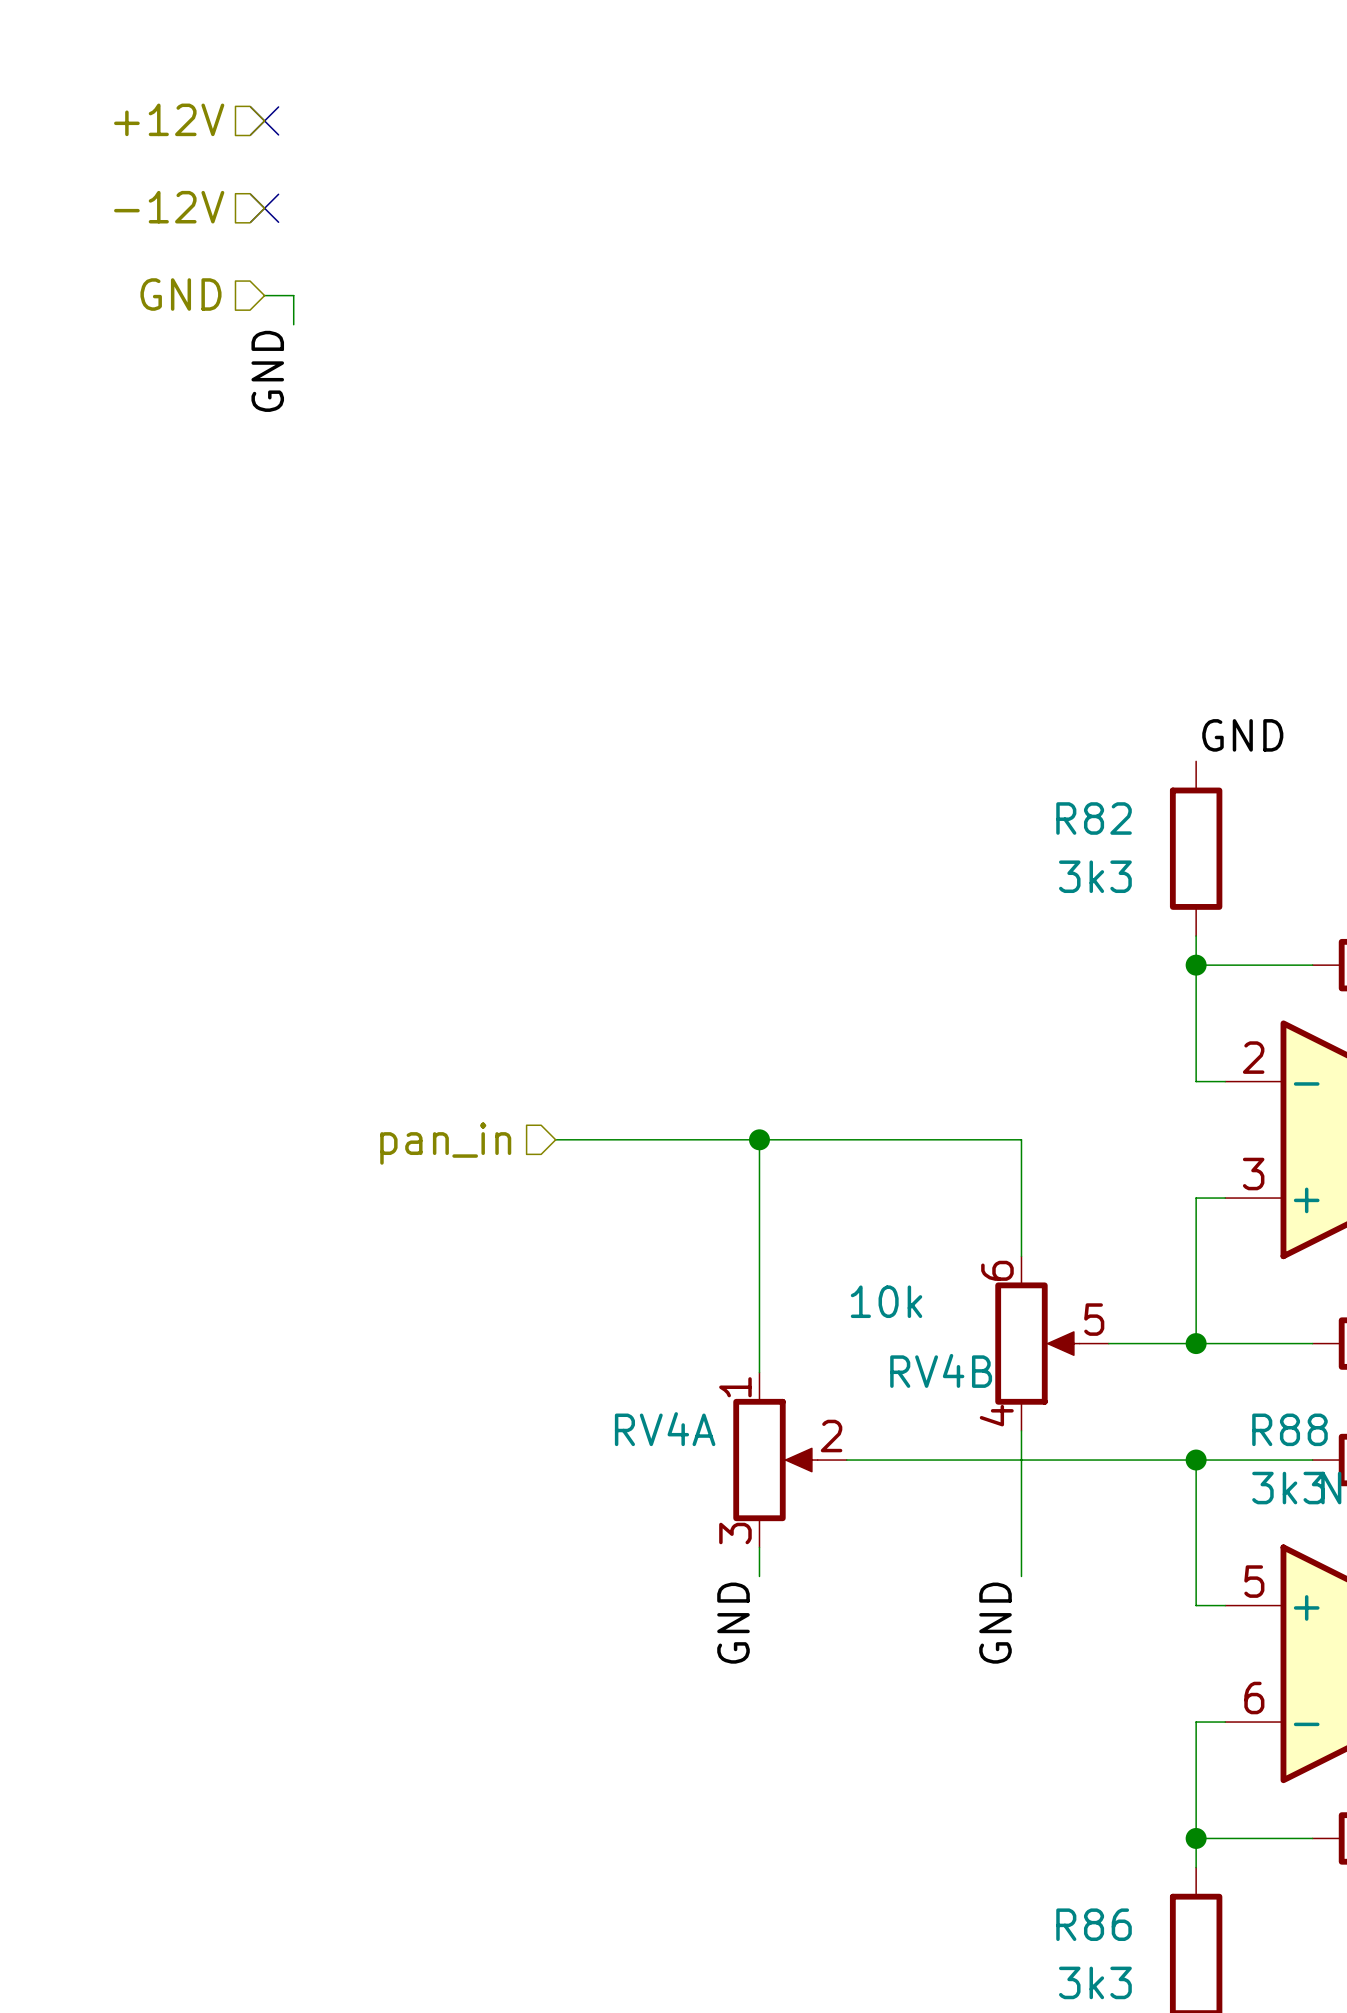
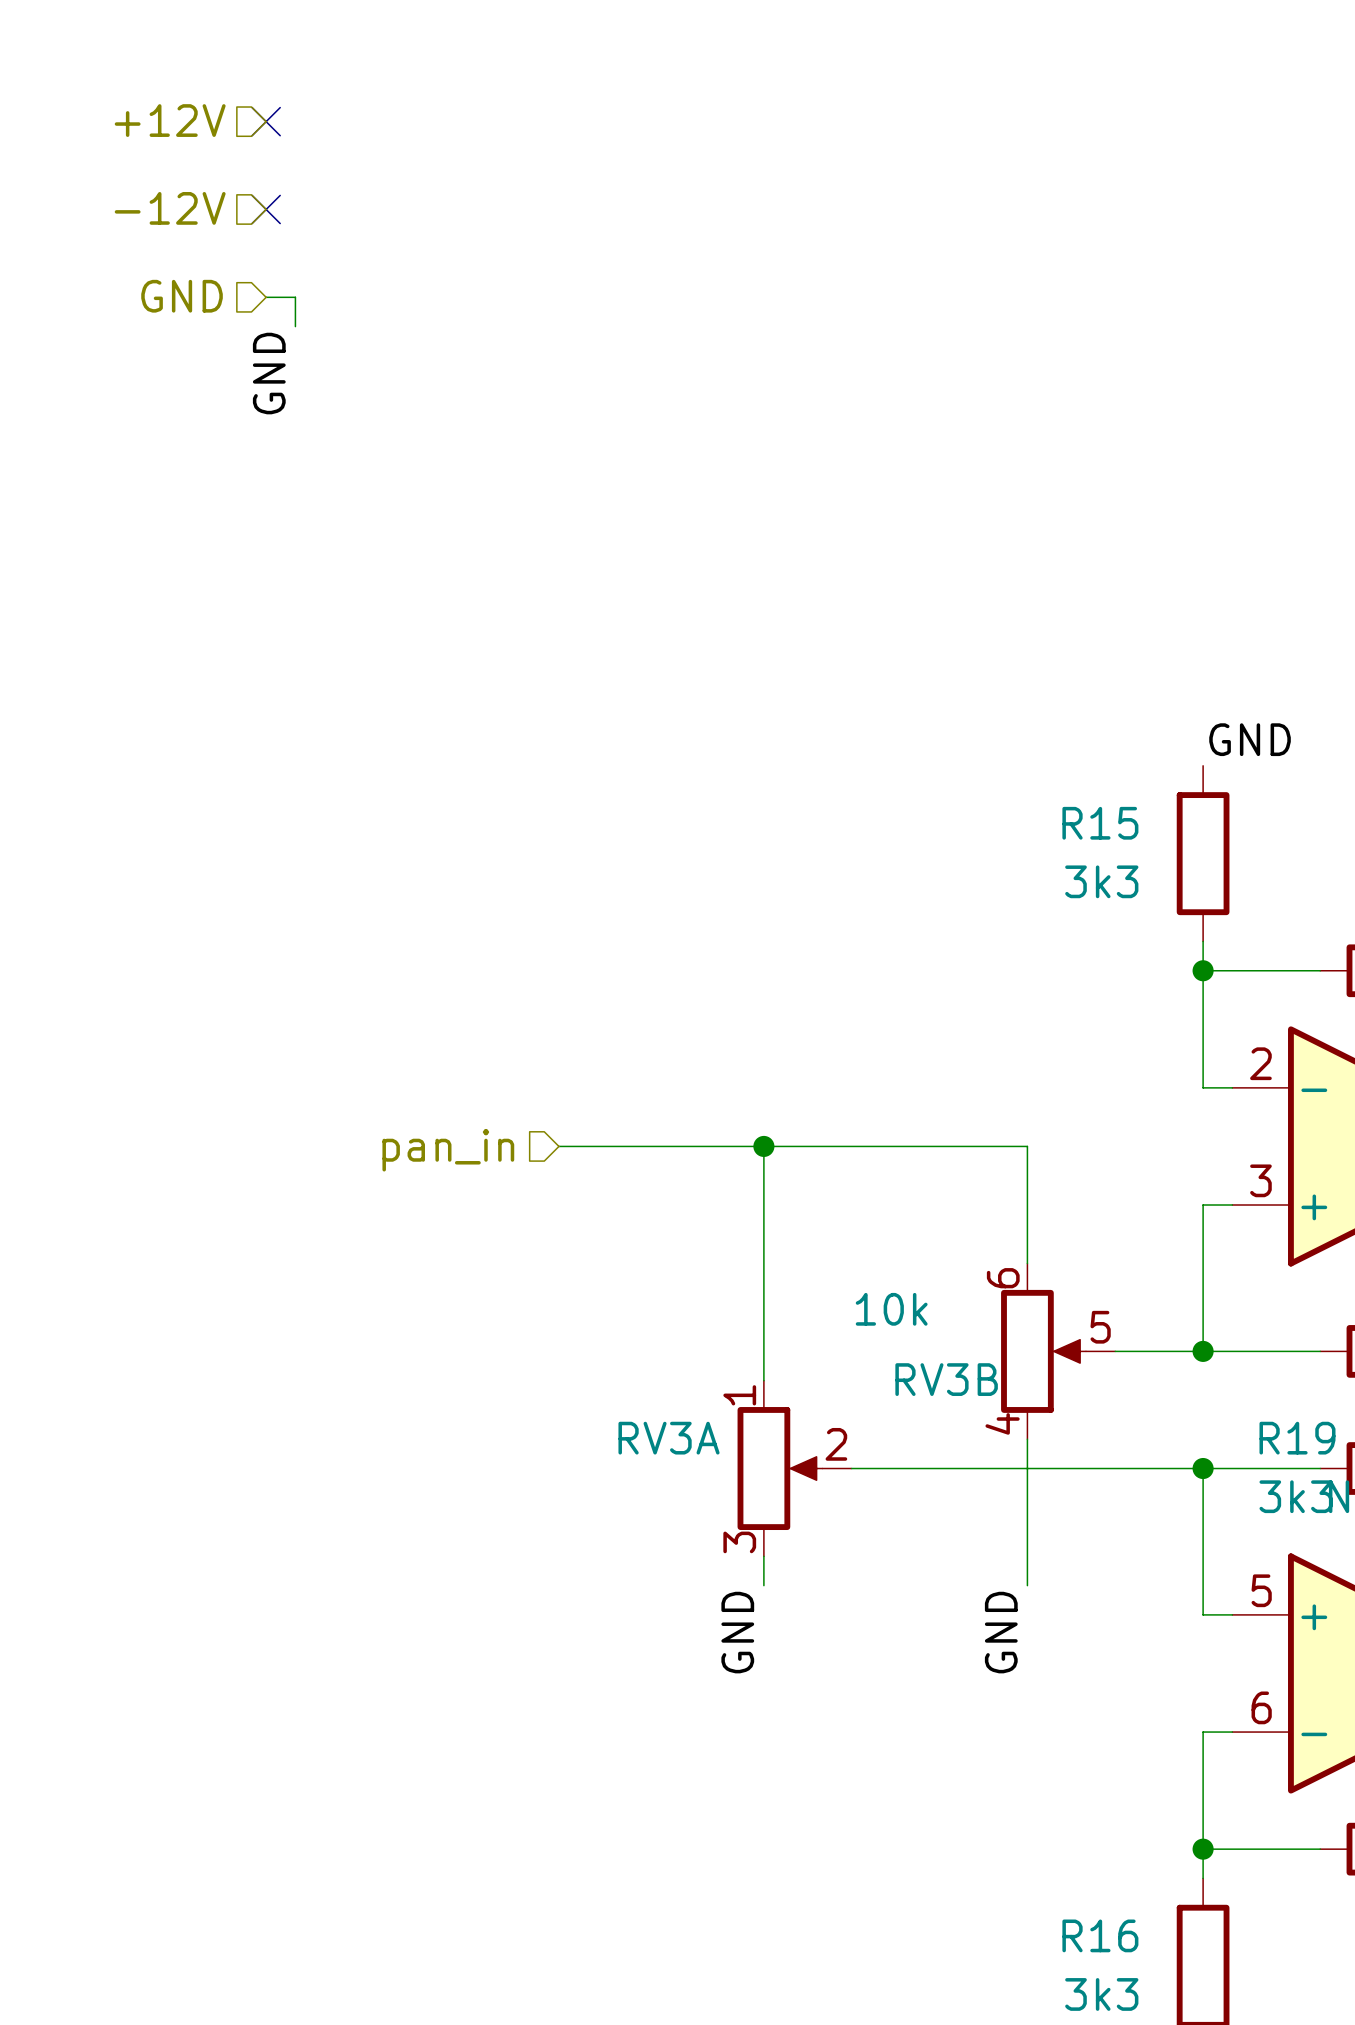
R82 name: R82 (1094, 818) -> R15 (1100, 823)
RV4B name: RV4B (941, 1370) -> RV3B (946, 1379)
RV4A name: RV4A (665, 1429) -> RV3A (669, 1438)
R88 name: R88 (1289, 1429) -> R19 (1297, 1438)
R86 name: R86 (1094, 1924) -> R16 (1100, 1935)

